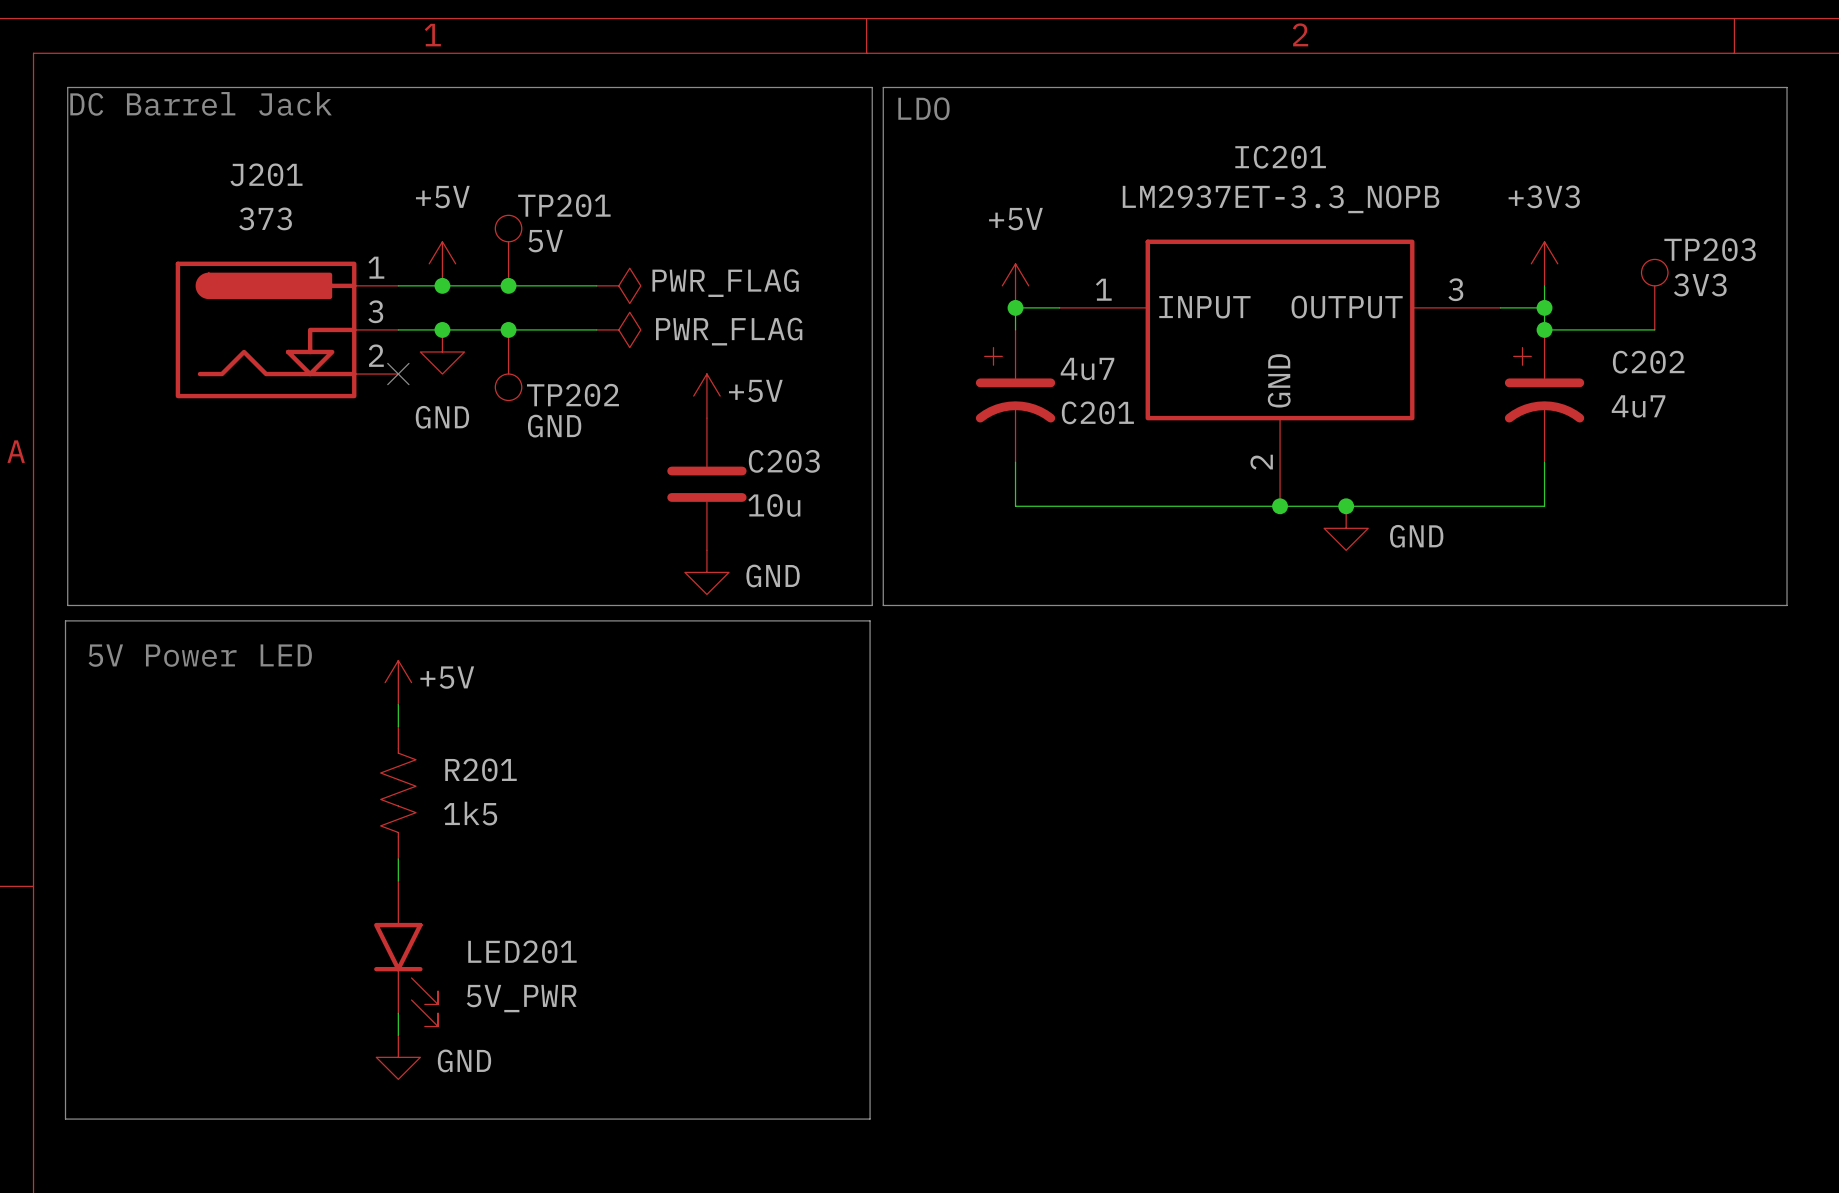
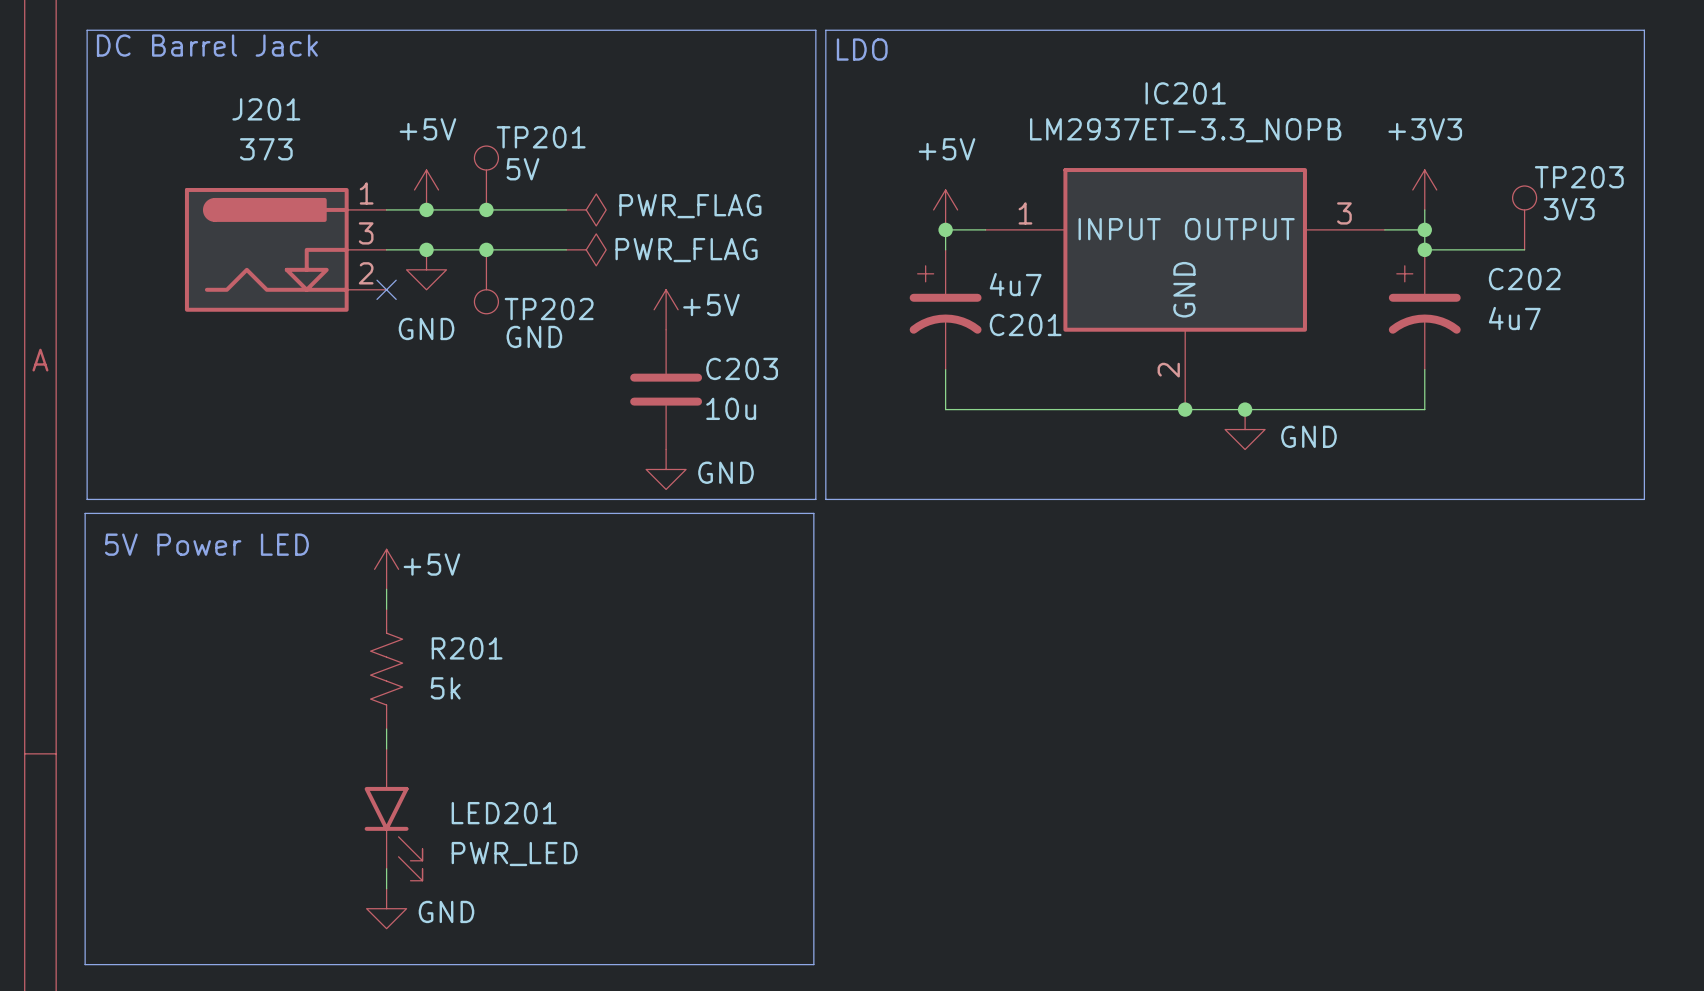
R201 value: 1k5 (470, 813) -> 5k (445, 688)
LED201 value: 5V_PWR (521, 998) -> PWR_LED (514, 854)

